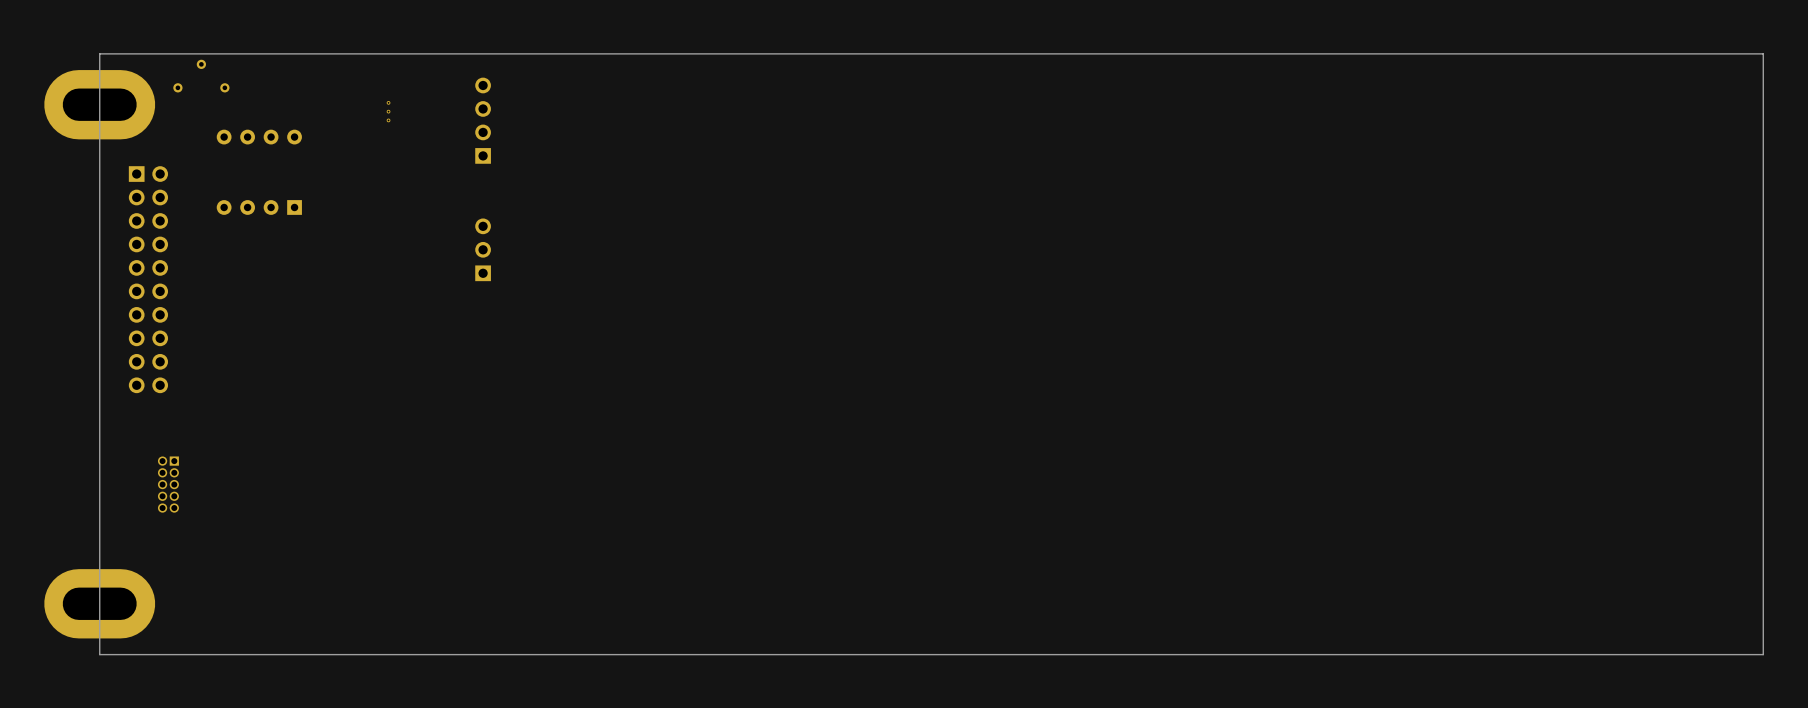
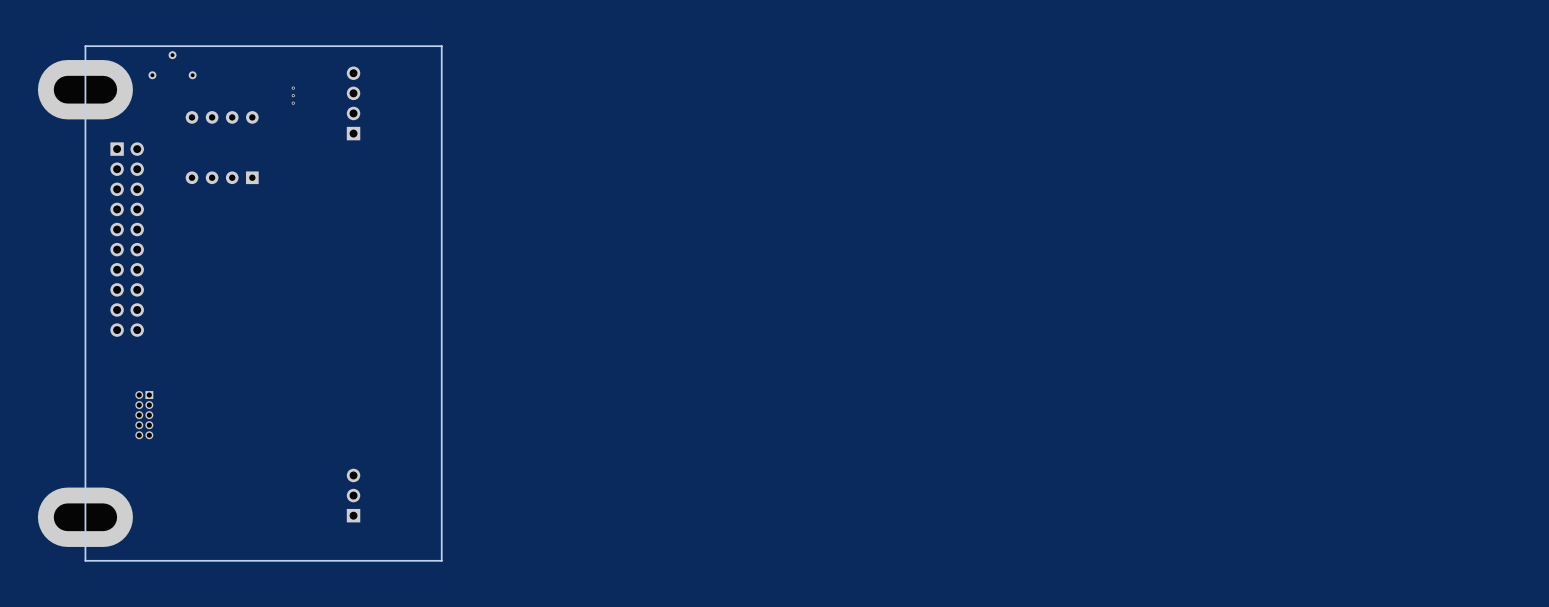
board edge: (515, 53) (1763, 53) (1763, 654) (515, 654) -> (441, 46) (441, 560)
part position: (388, 111) -> (293, 95)
part position: (483, 120) -> (353, 103)
part: (483, 249) -> none
part: none -> (353, 495)

